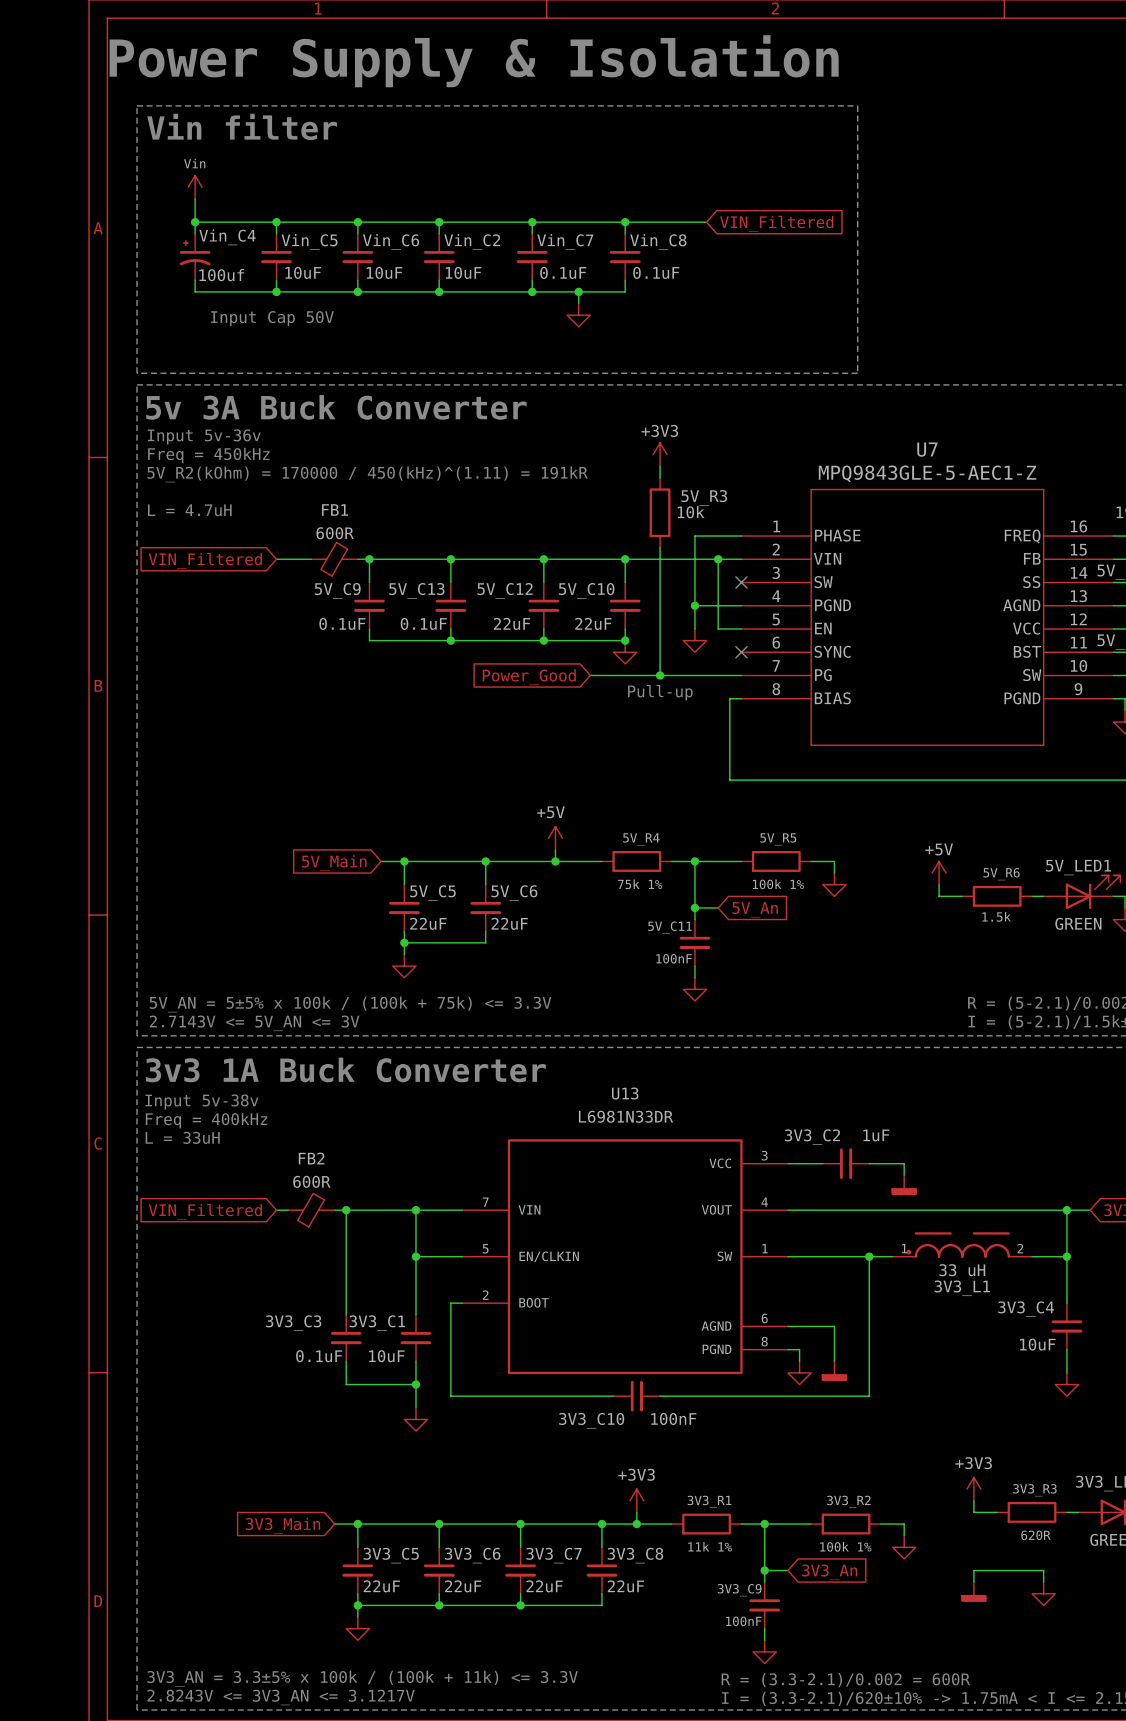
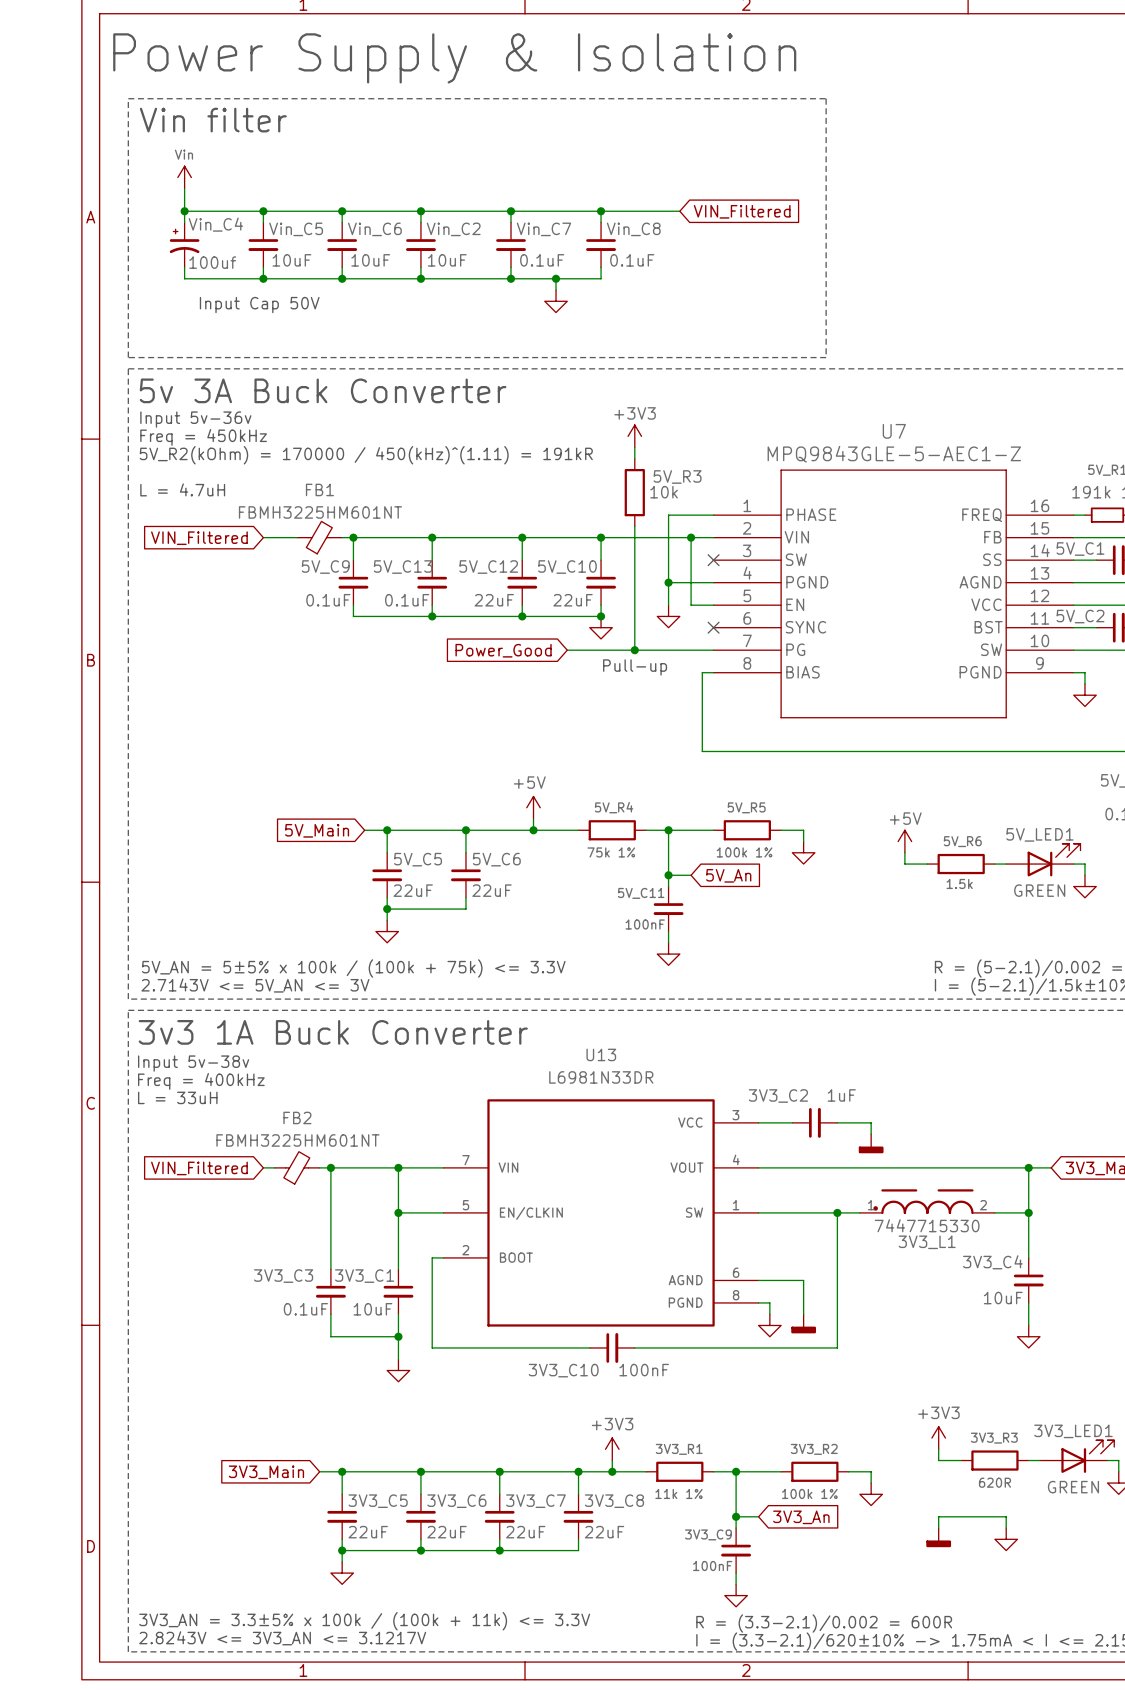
FB1 value: 600R (335, 533) -> FBMH3225HM601NT (320, 512)
FB2 value: 600R (311, 1181) -> FBMH3225HM601NT (297, 1140)
3V3_L1 value: 33 uH (962, 1270) -> 7447715330 (927, 1225)

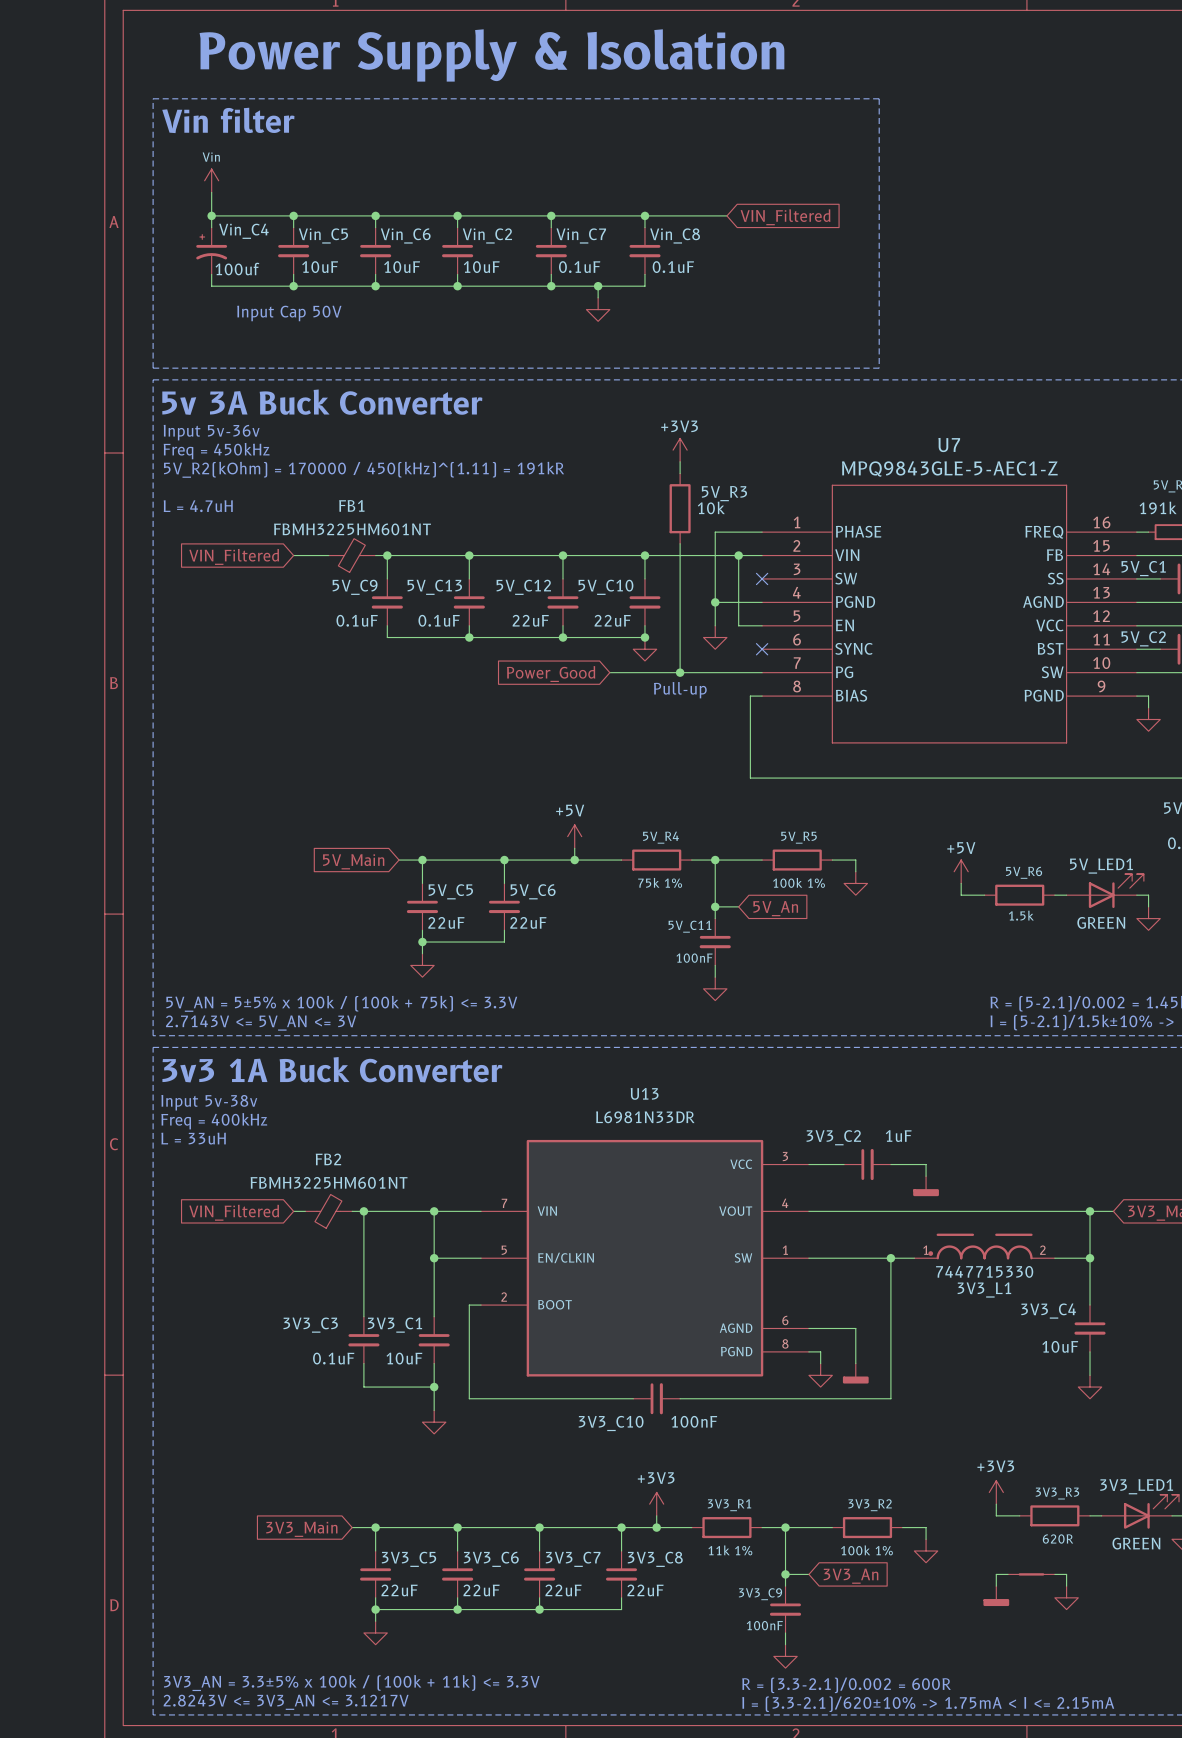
part: none -> (1031, 1574)

